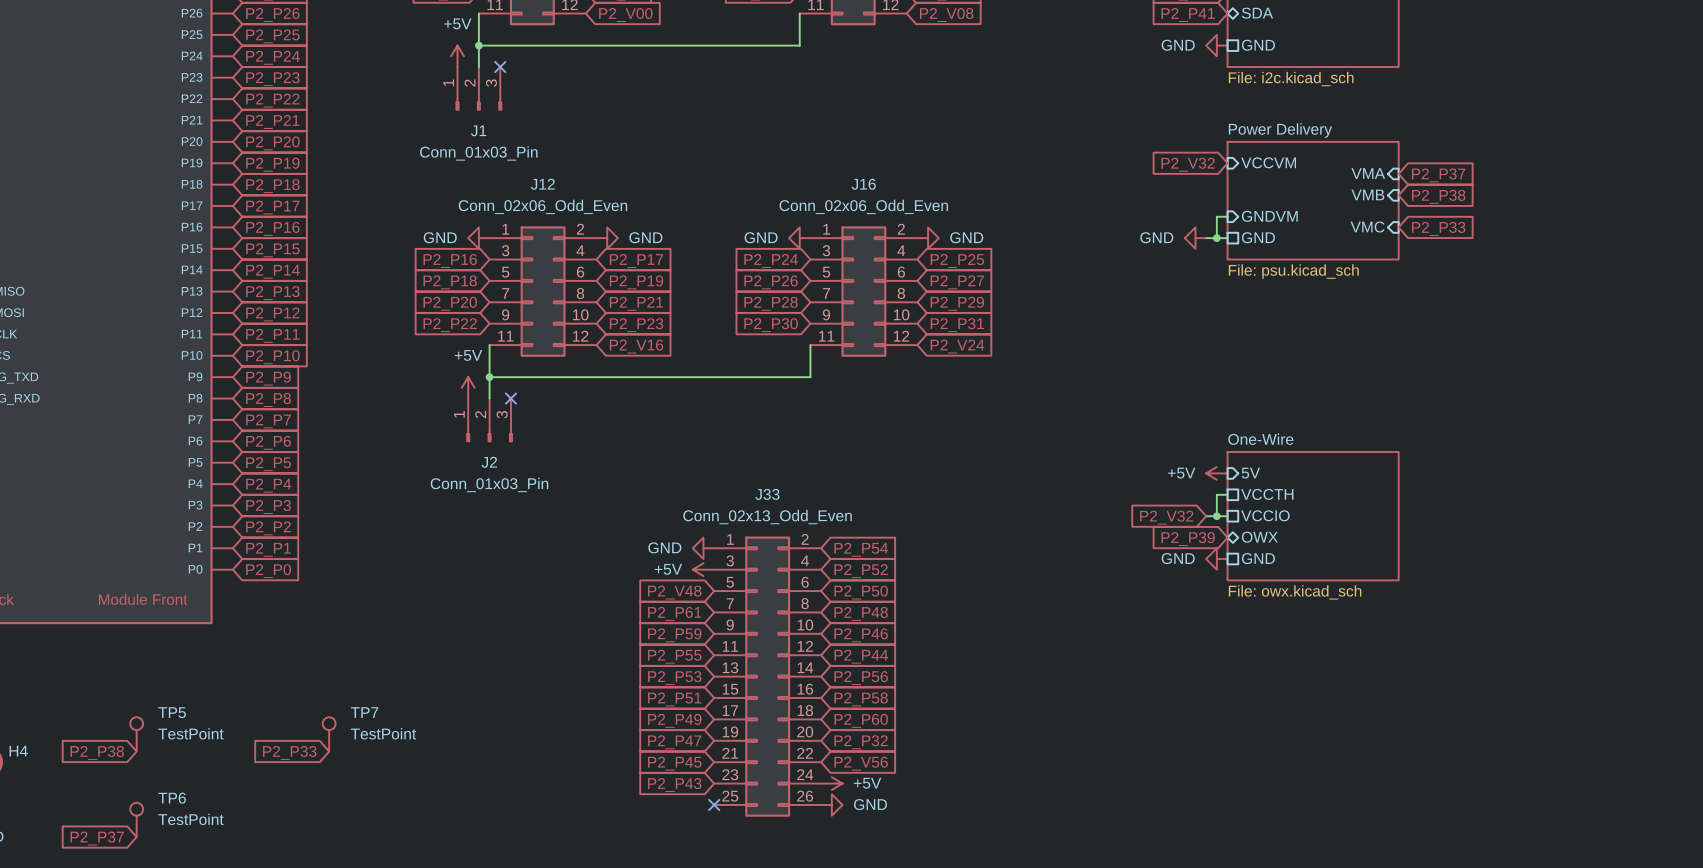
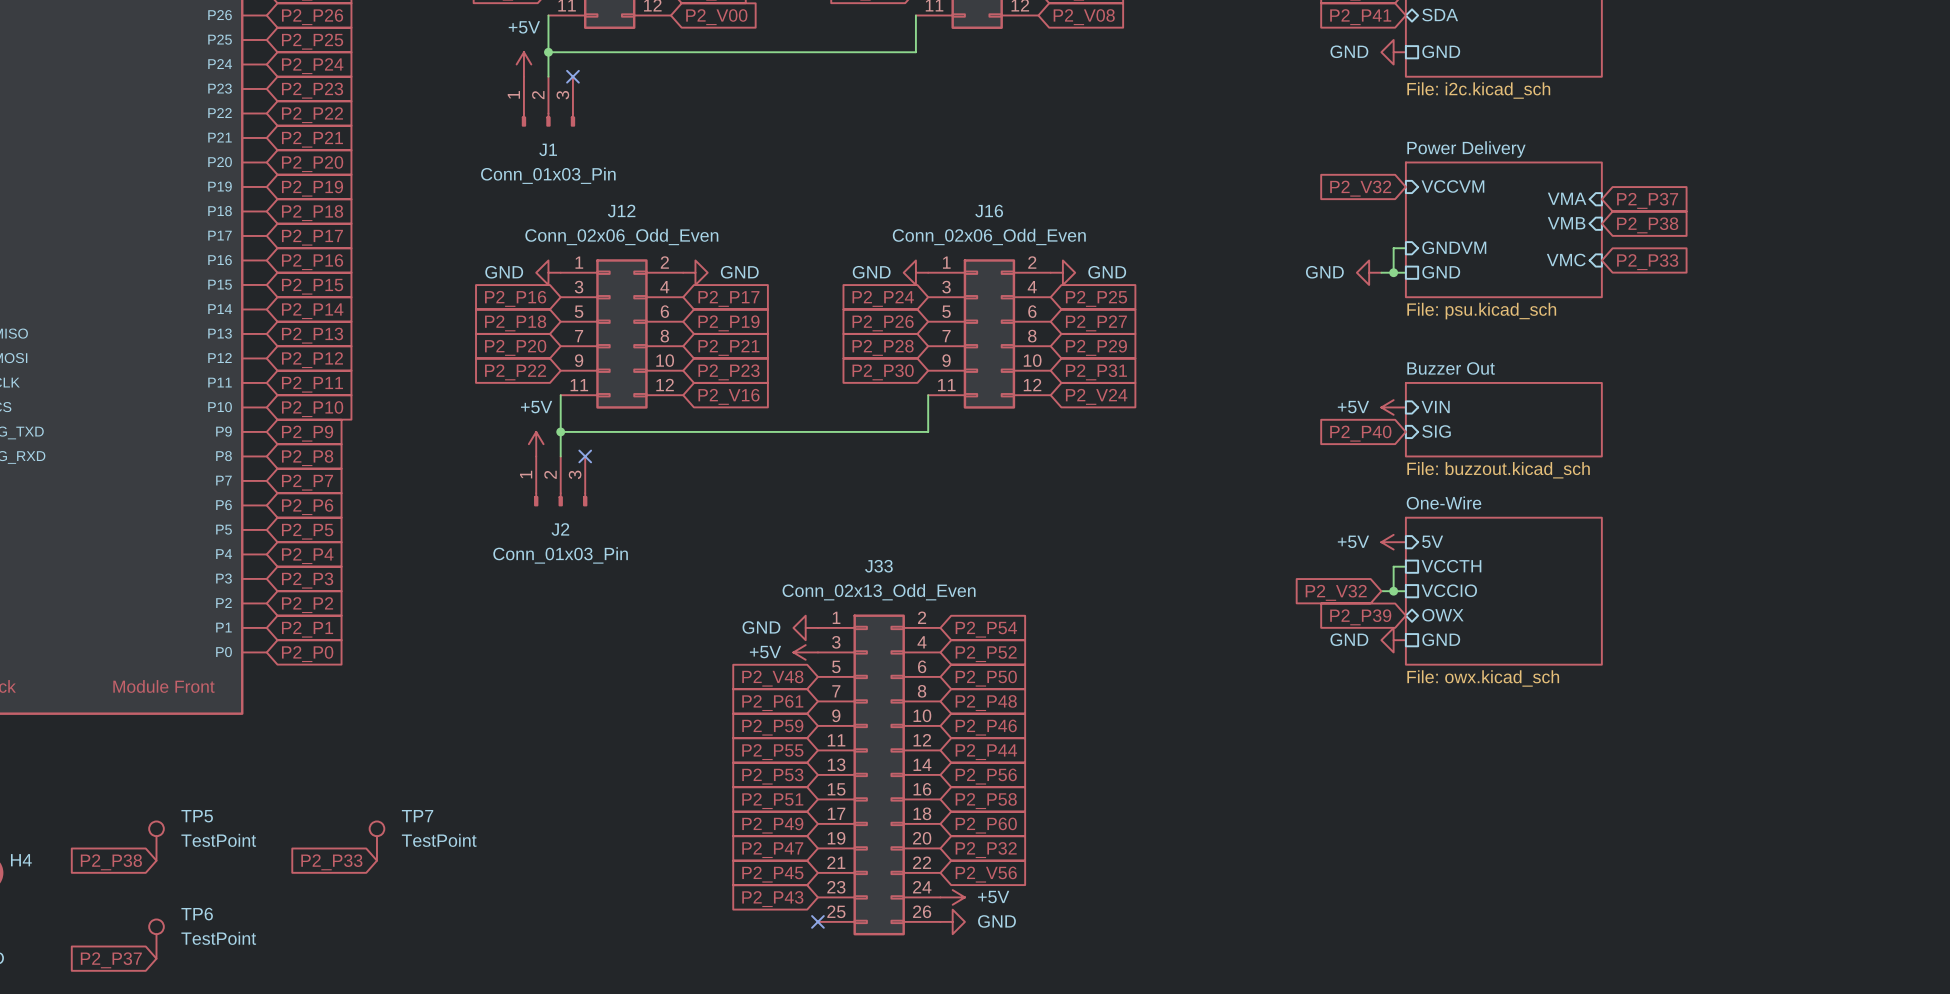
power symbol: none -> +5V (1393, 407)
sheet pin: none -> VIN (1435, 407)
sheet Buzzer Out: none -> File: buzzout.kicad_sch (1503, 419)
sheet pin: none -> SIG (1436, 431)
global label: none -> P2_P40 (1360, 433)

